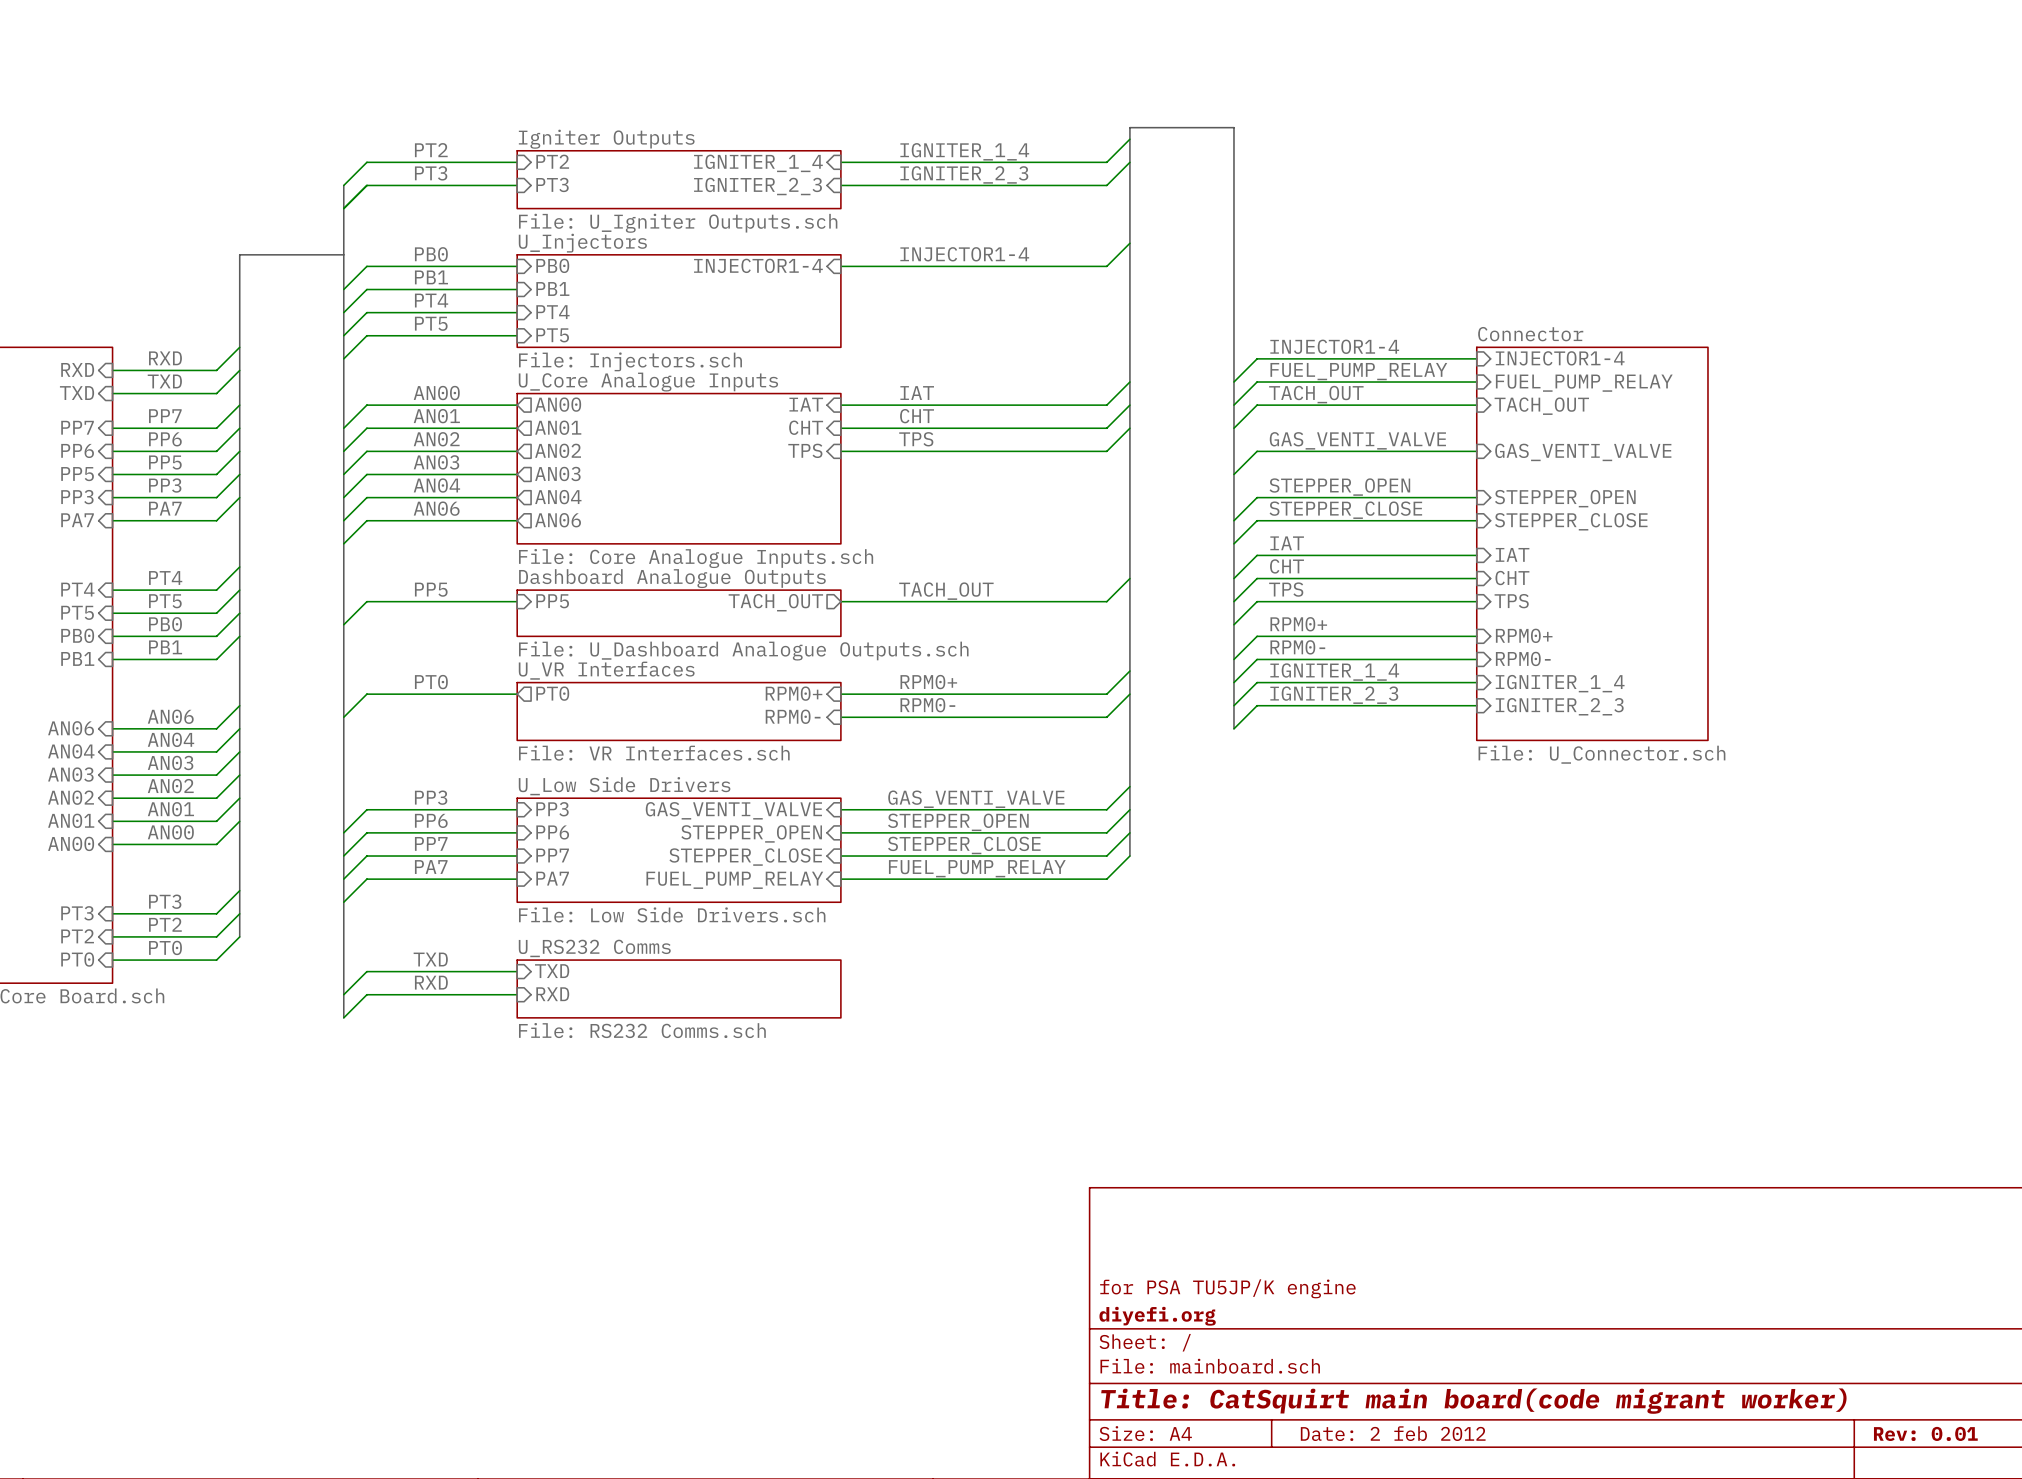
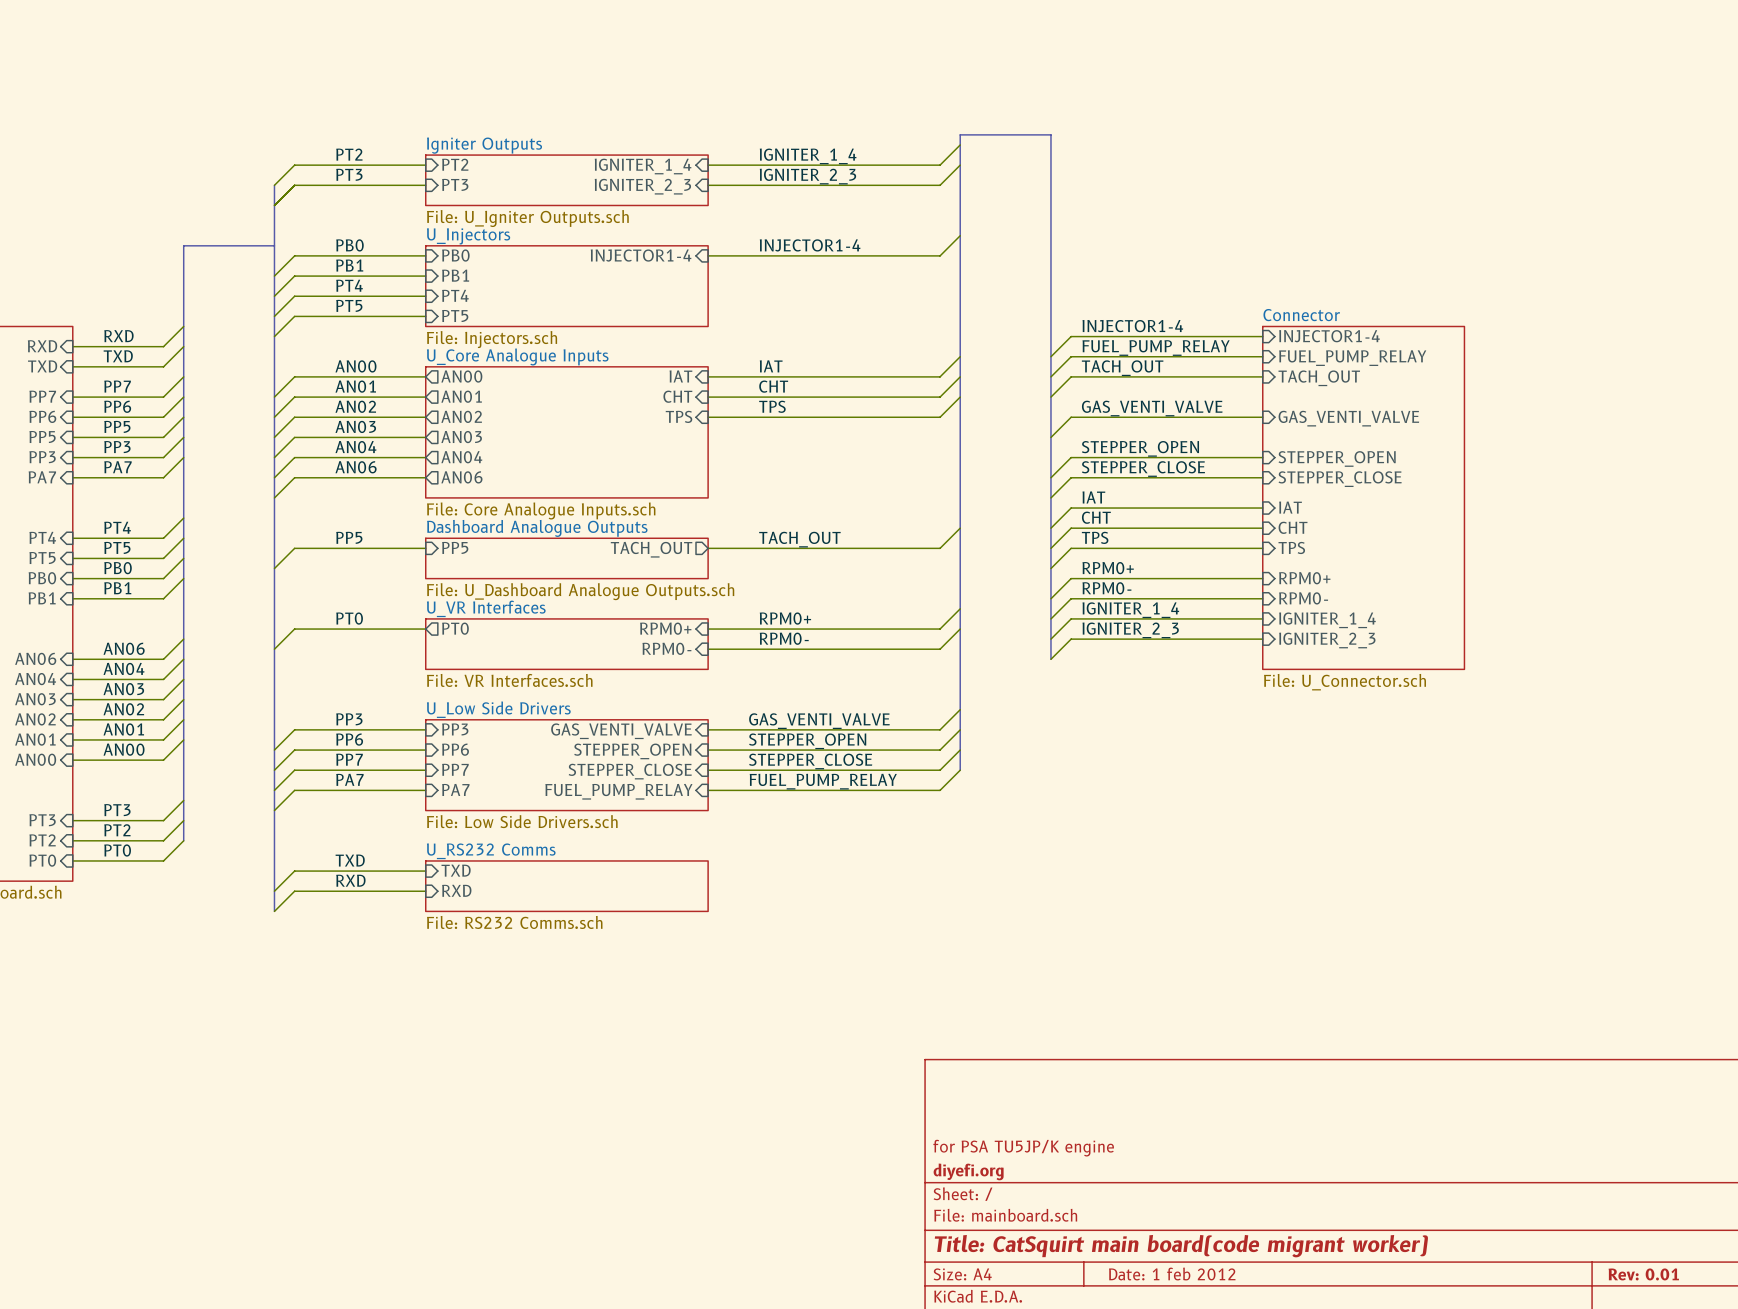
title block: Date: 2 feb 2012 (1393, 1433) -> Date: 1 feb 2012 (1172, 1274)

